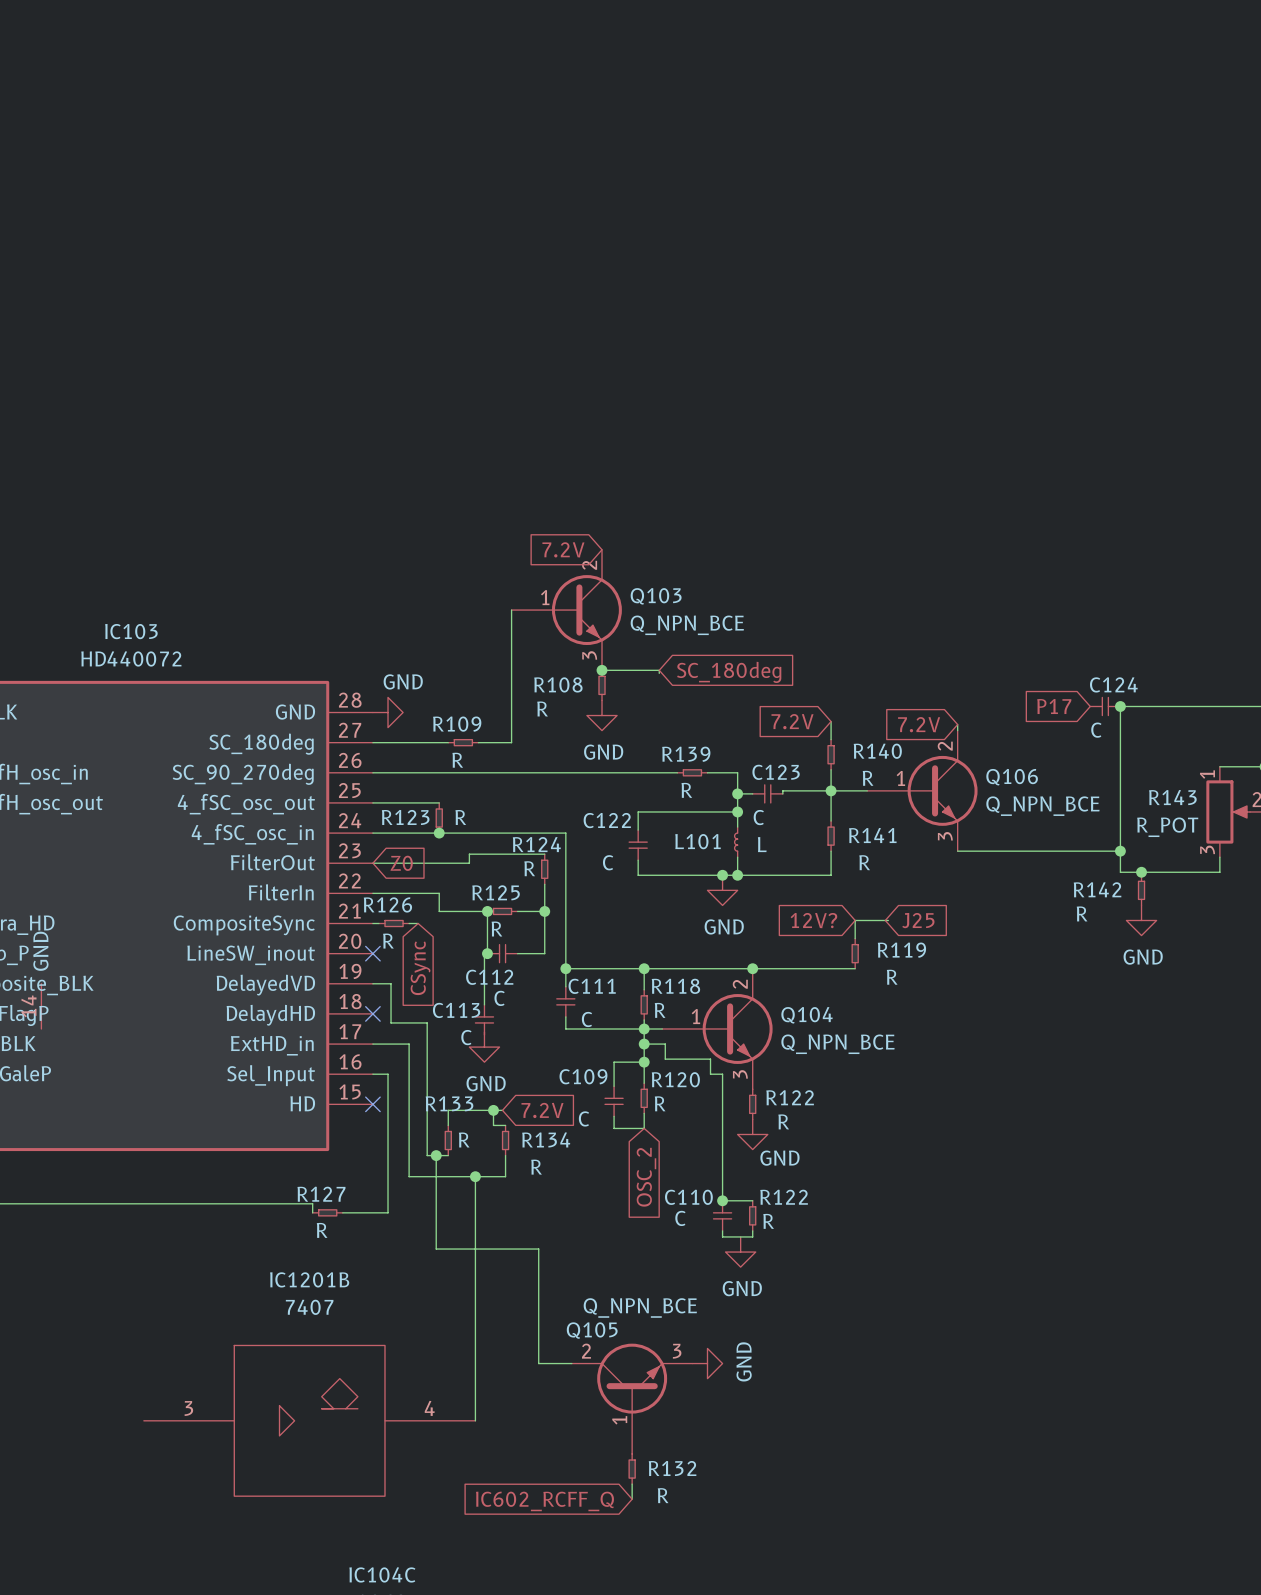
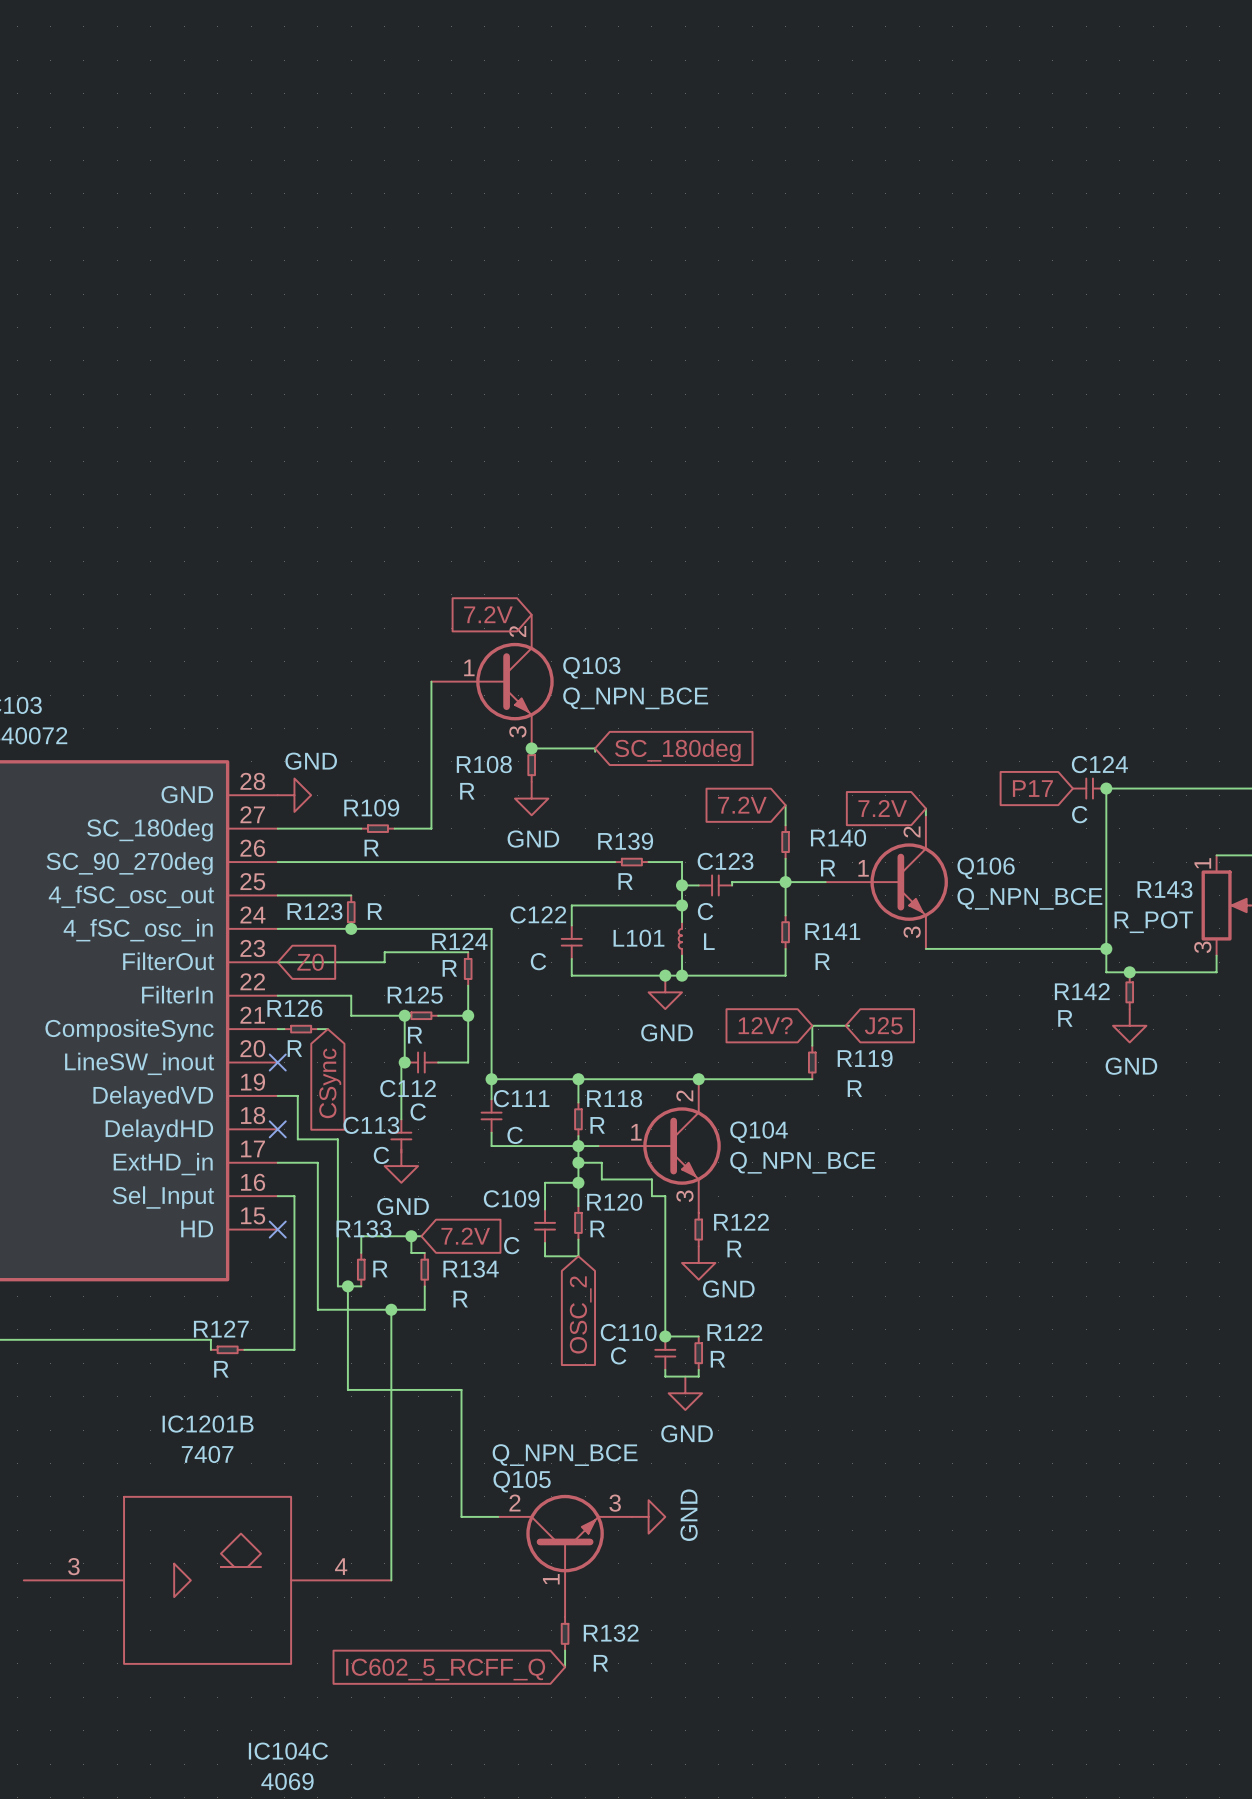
global label: IC602_RCFF_Q (544, 1501) -> IC602_5_RCFF_Q (445, 1669)

